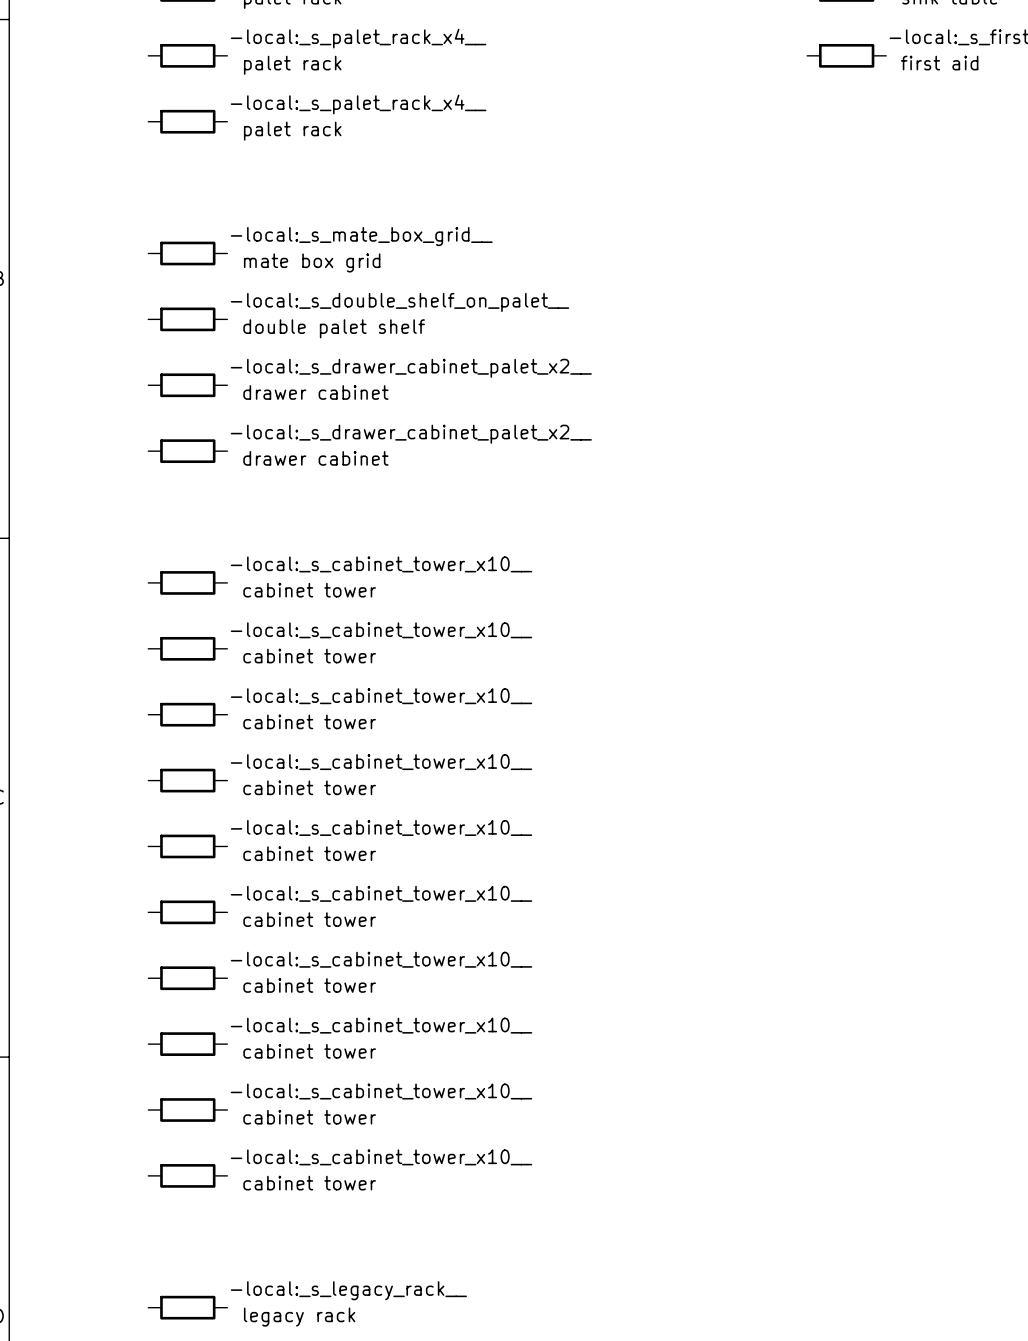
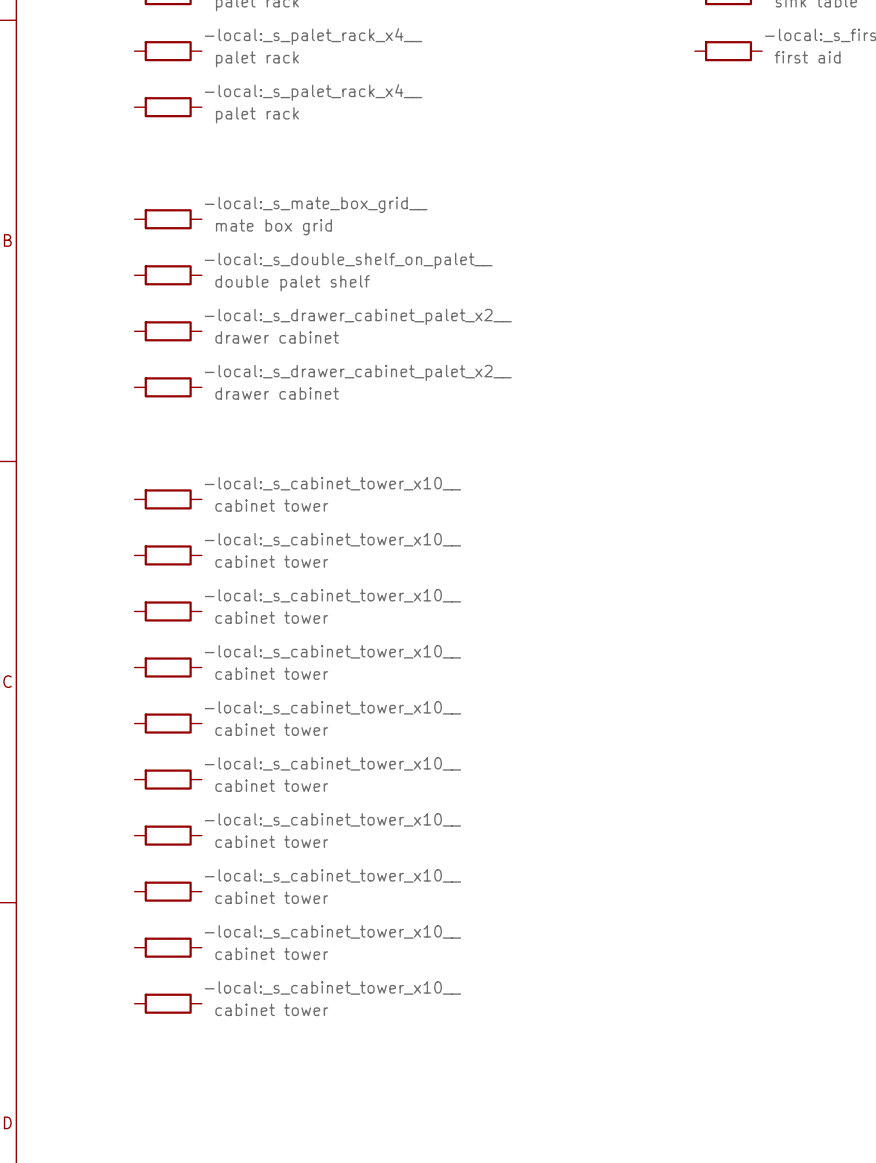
part: legacy rack (187, 1307) -> none

